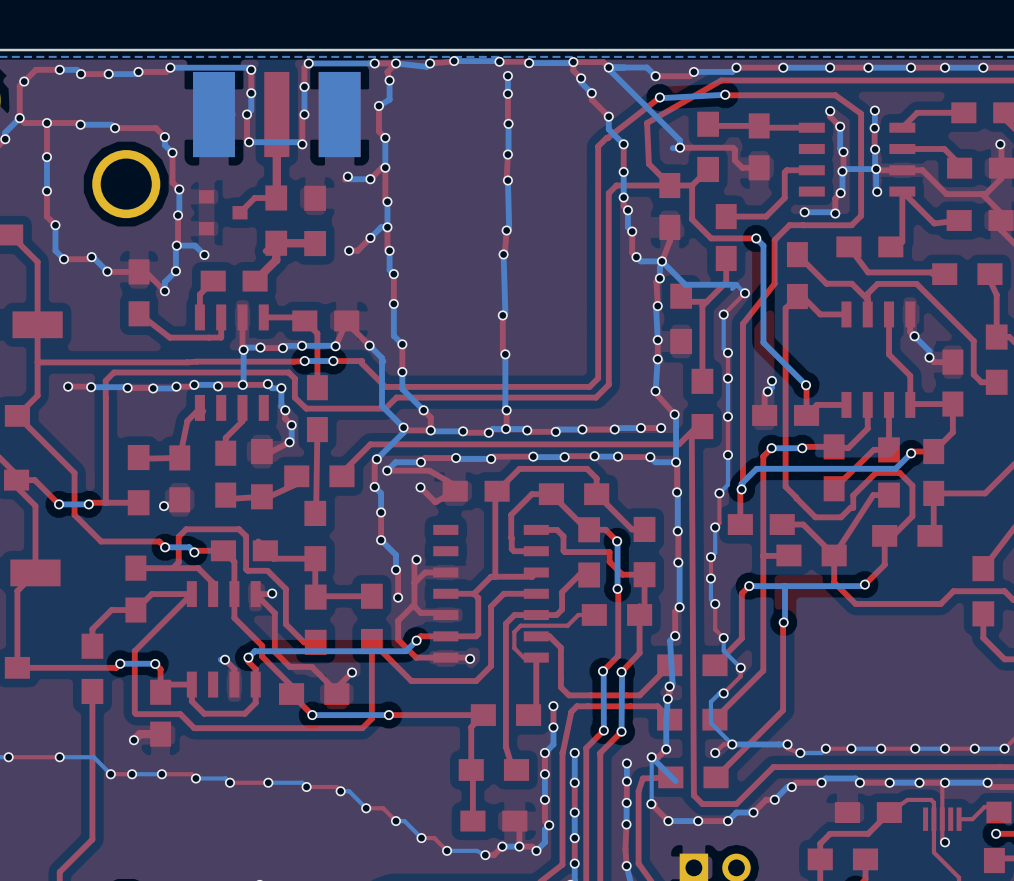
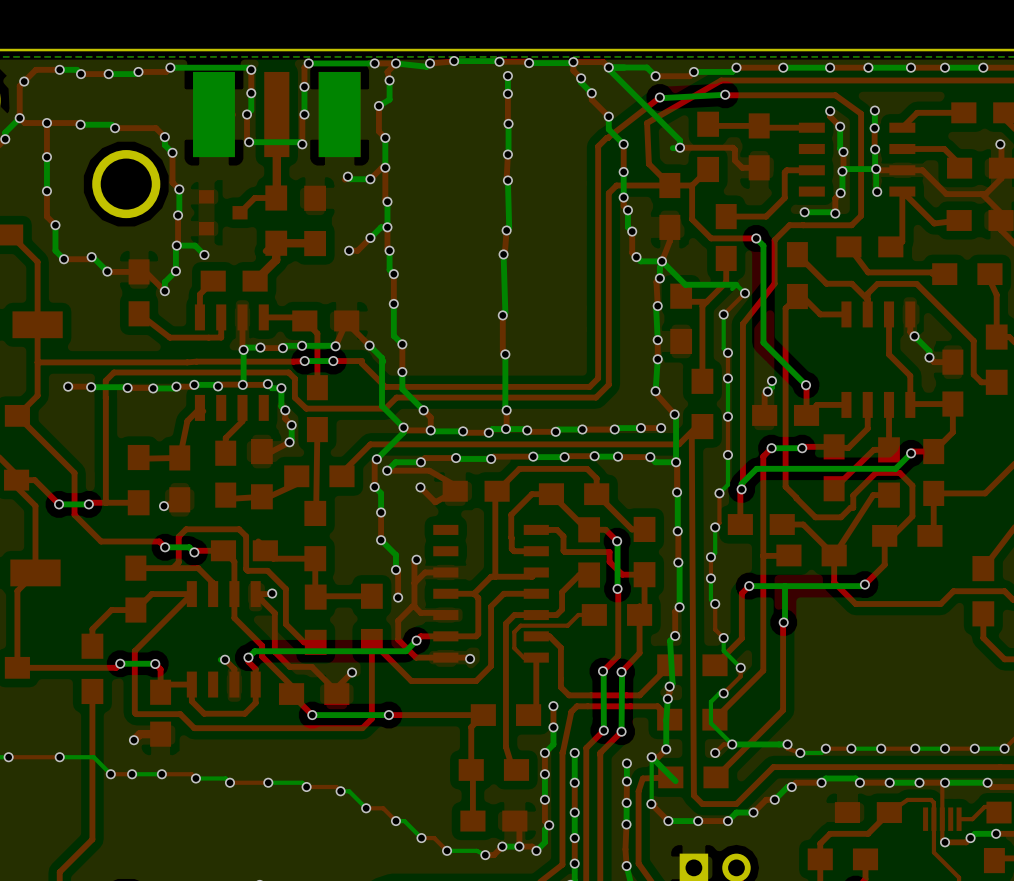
bottom track: none -> (996, 833) (974, 833) (970, 838)
top track: none -> (970, 838) (966, 842) (945, 842)
via: none -> (970, 838)

